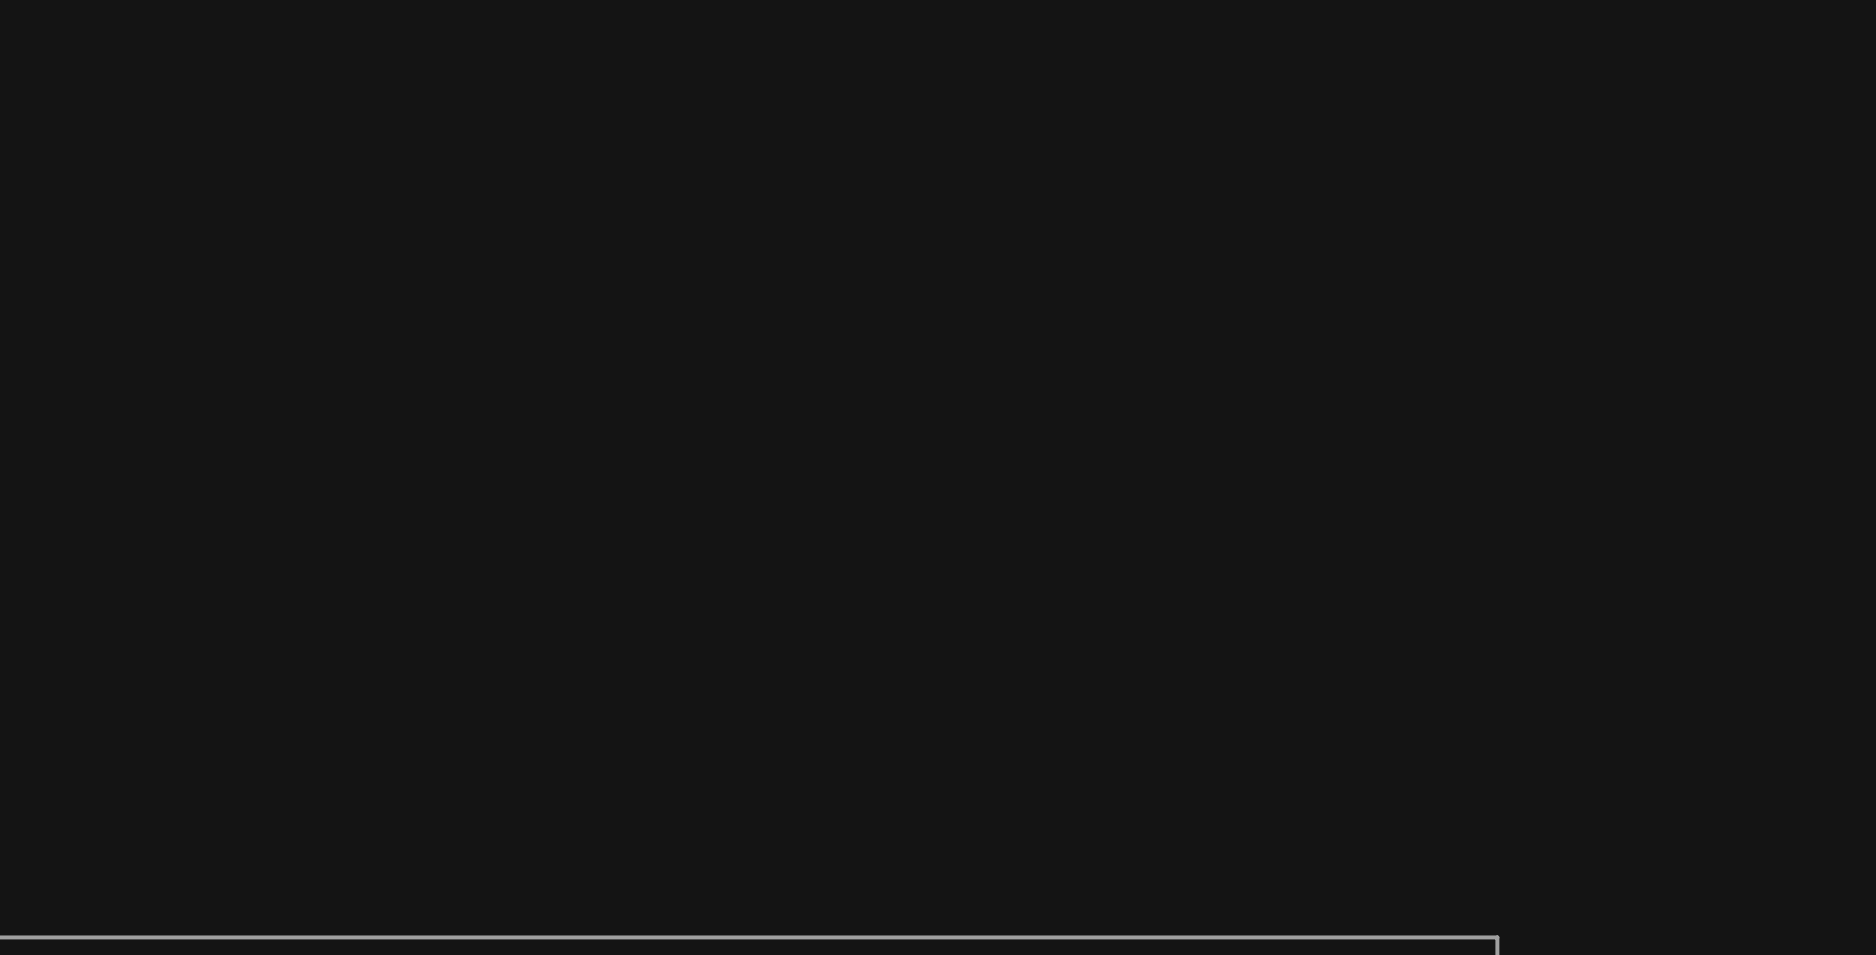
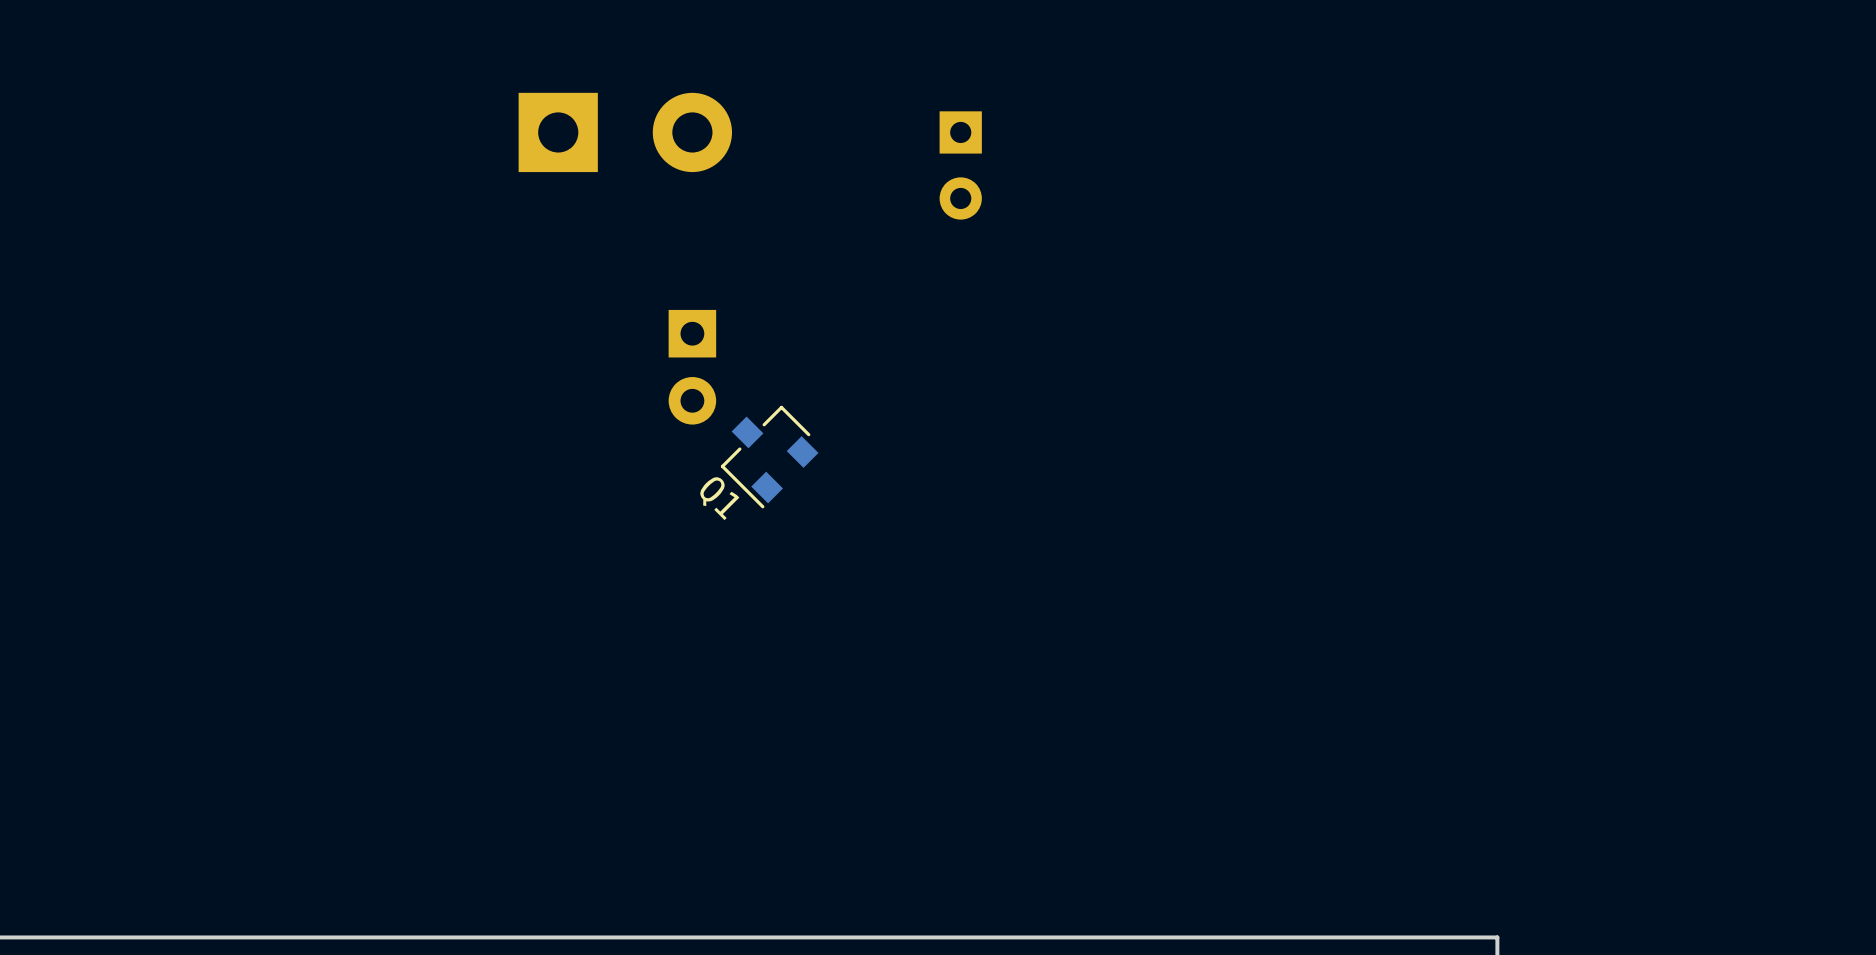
part: none -> (625, 132)
part: none -> (960, 165)
part: none -> (692, 367)
Q1: none -> (769, 457)

